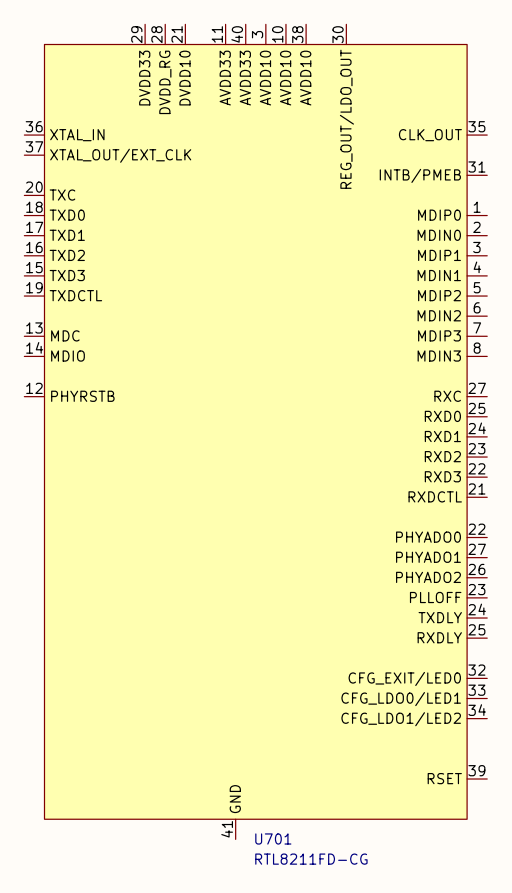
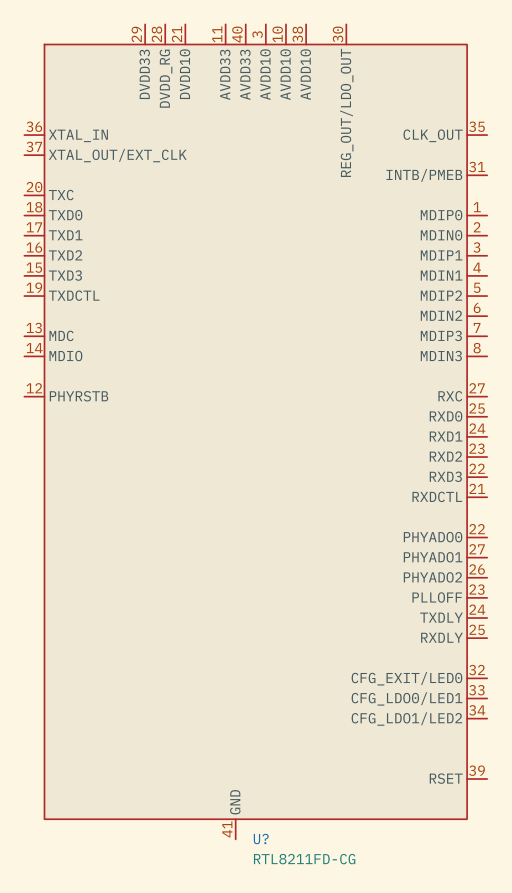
U701 name: U701 (273, 838) -> U? (261, 838)

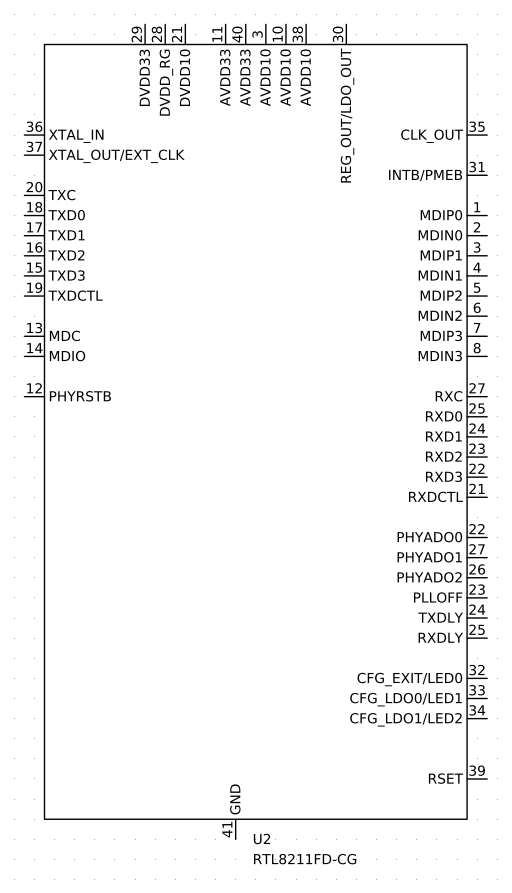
U? name: U? (261, 838) -> U2 (261, 838)

